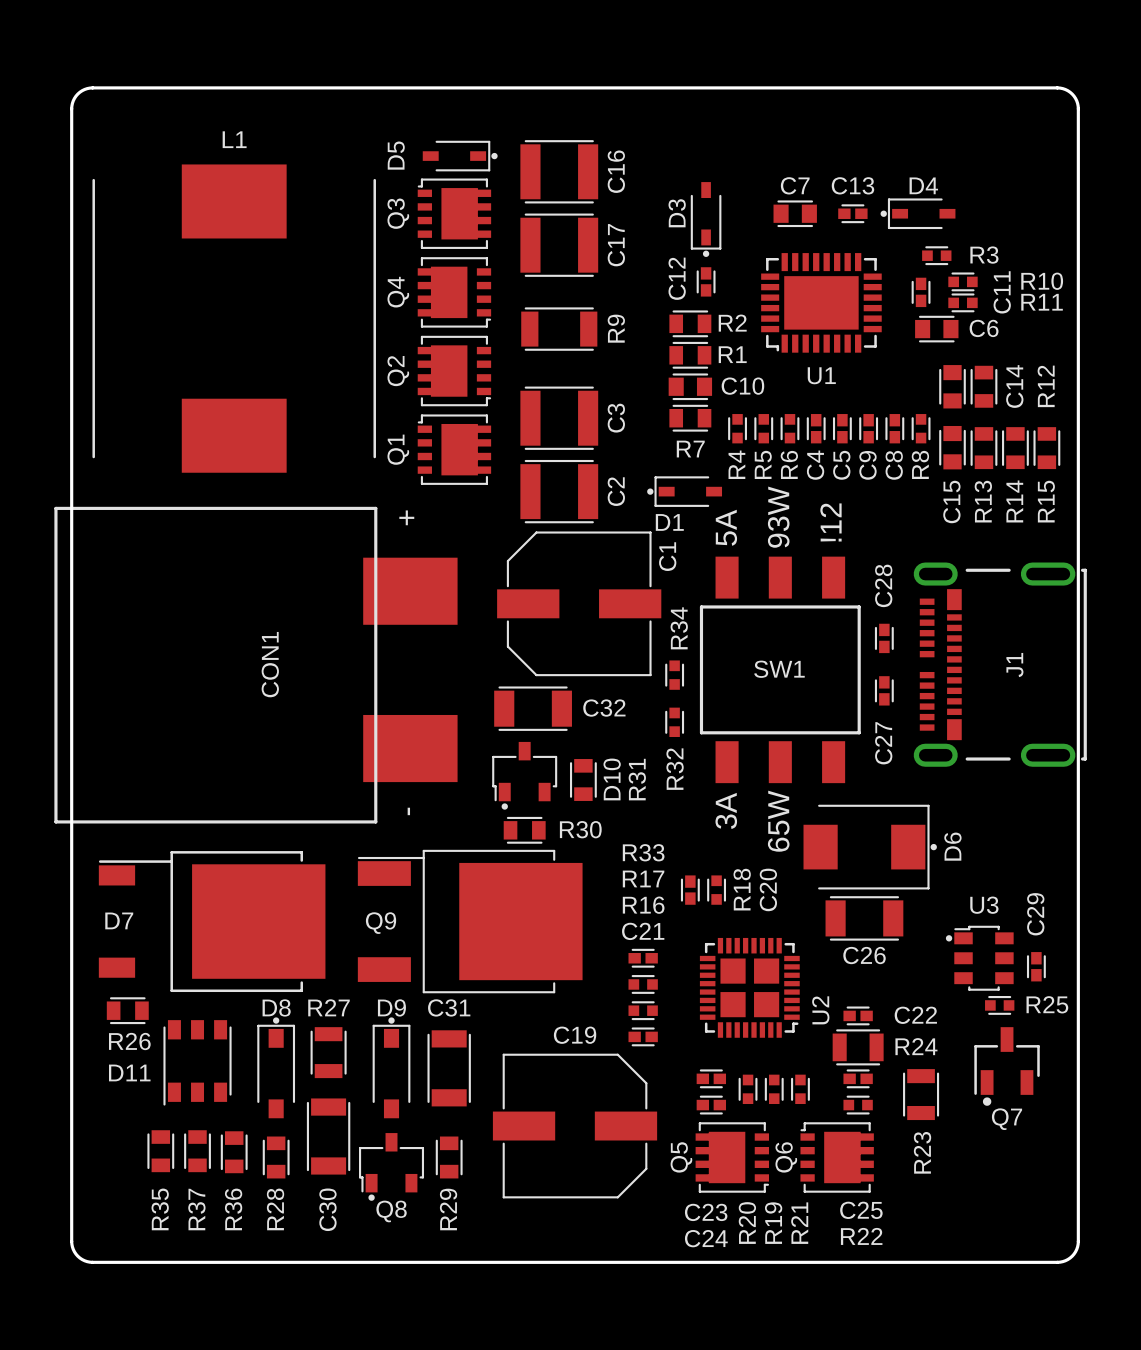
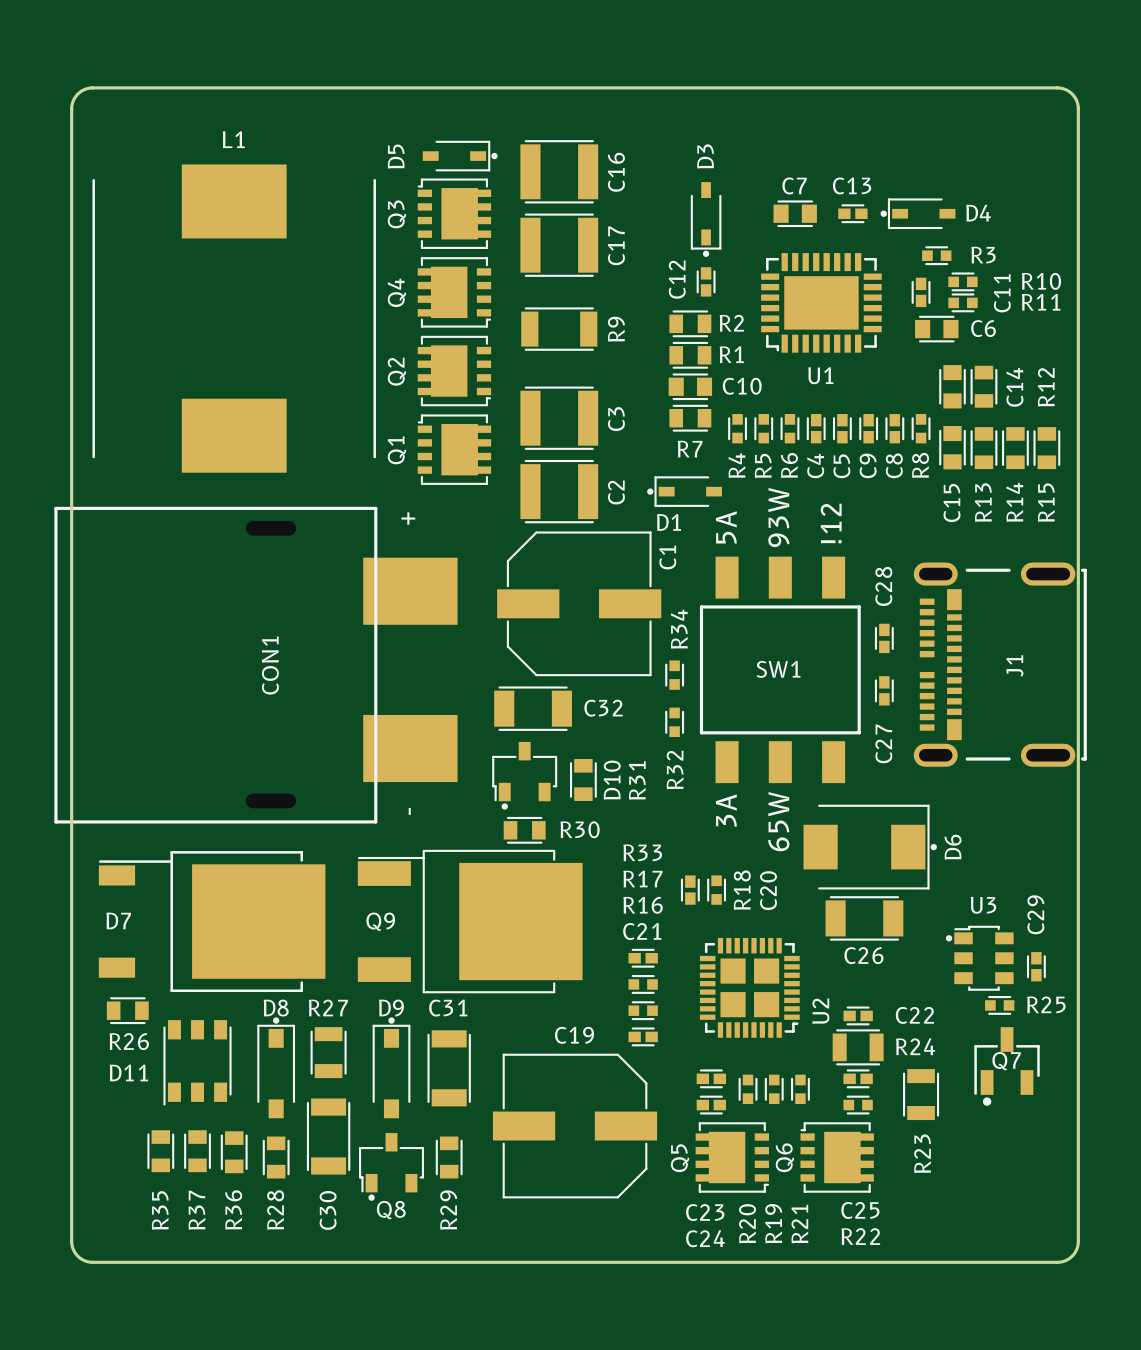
D4 name position: D4 (923, 185) -> D4 (978, 213)
D3 name position: D3 (677, 213) -> D3 (705, 156)
Q7 name position: Q7 (1007, 1119) -> Q7 (1006, 1061)

